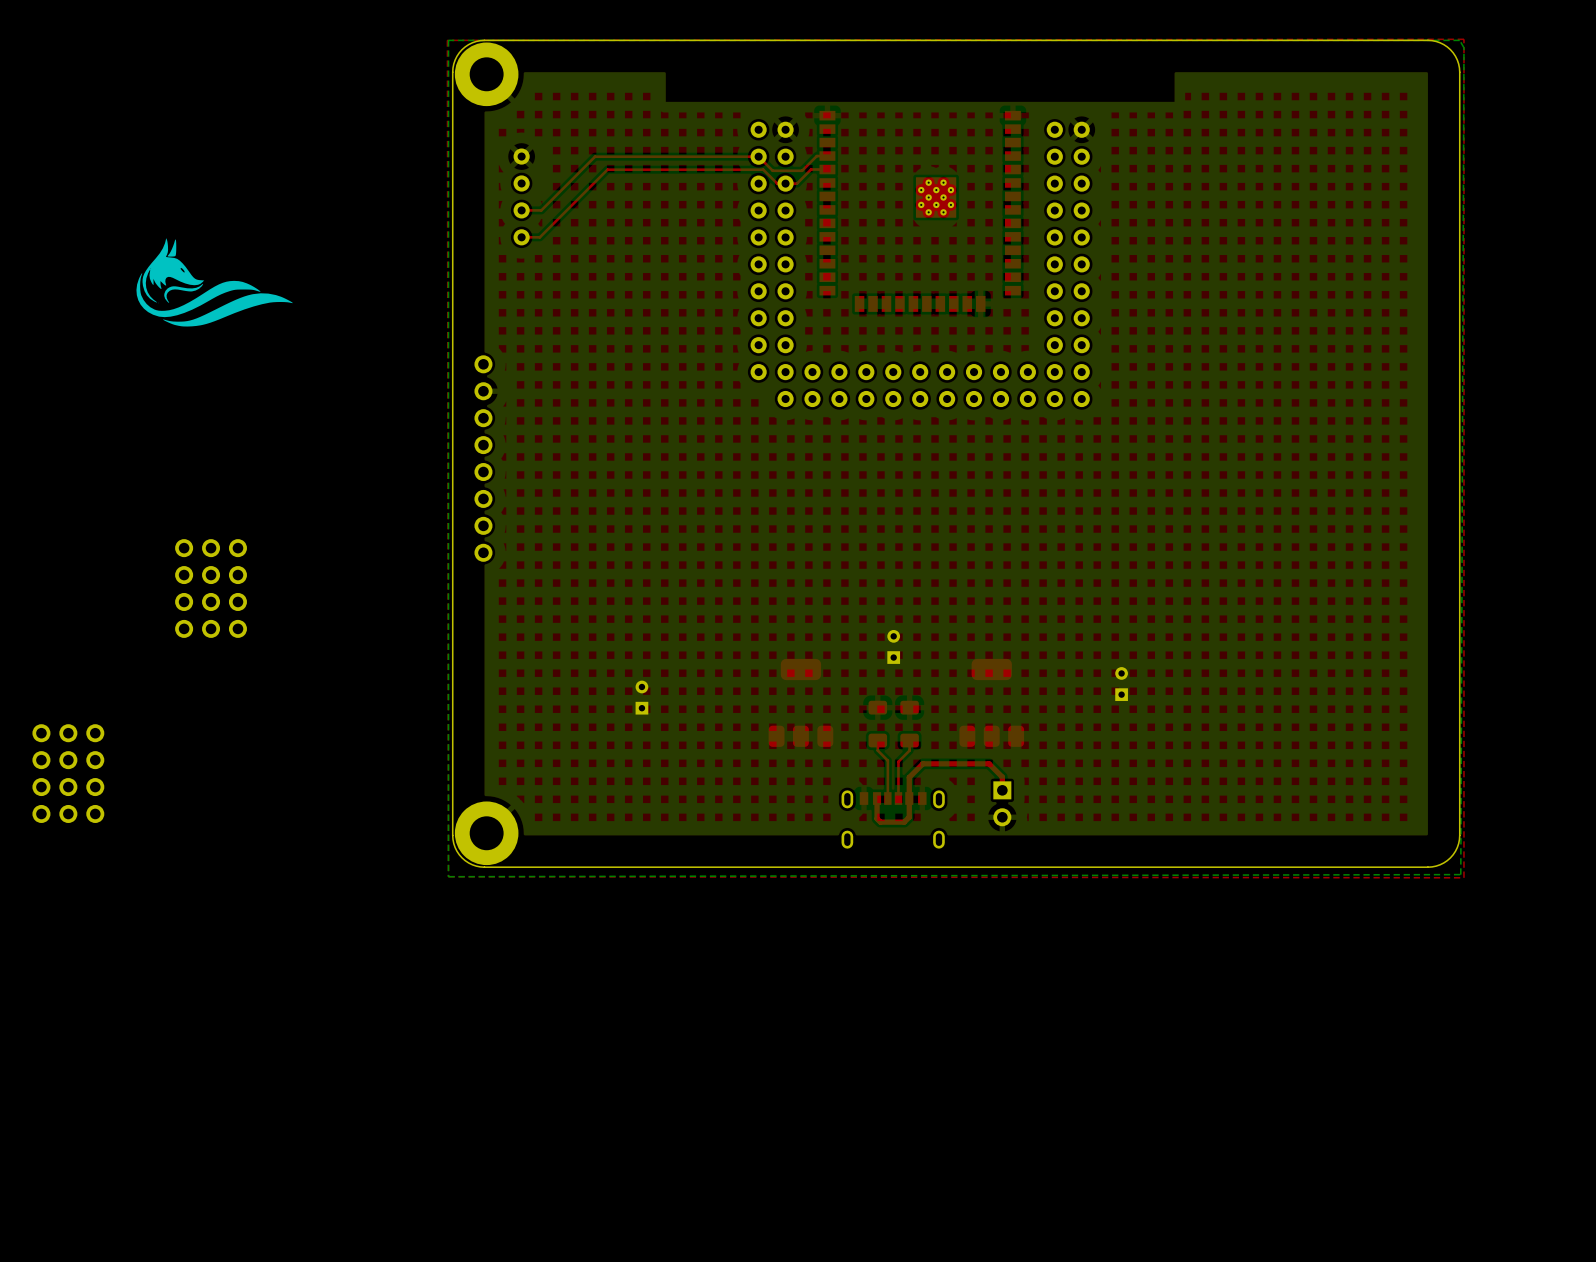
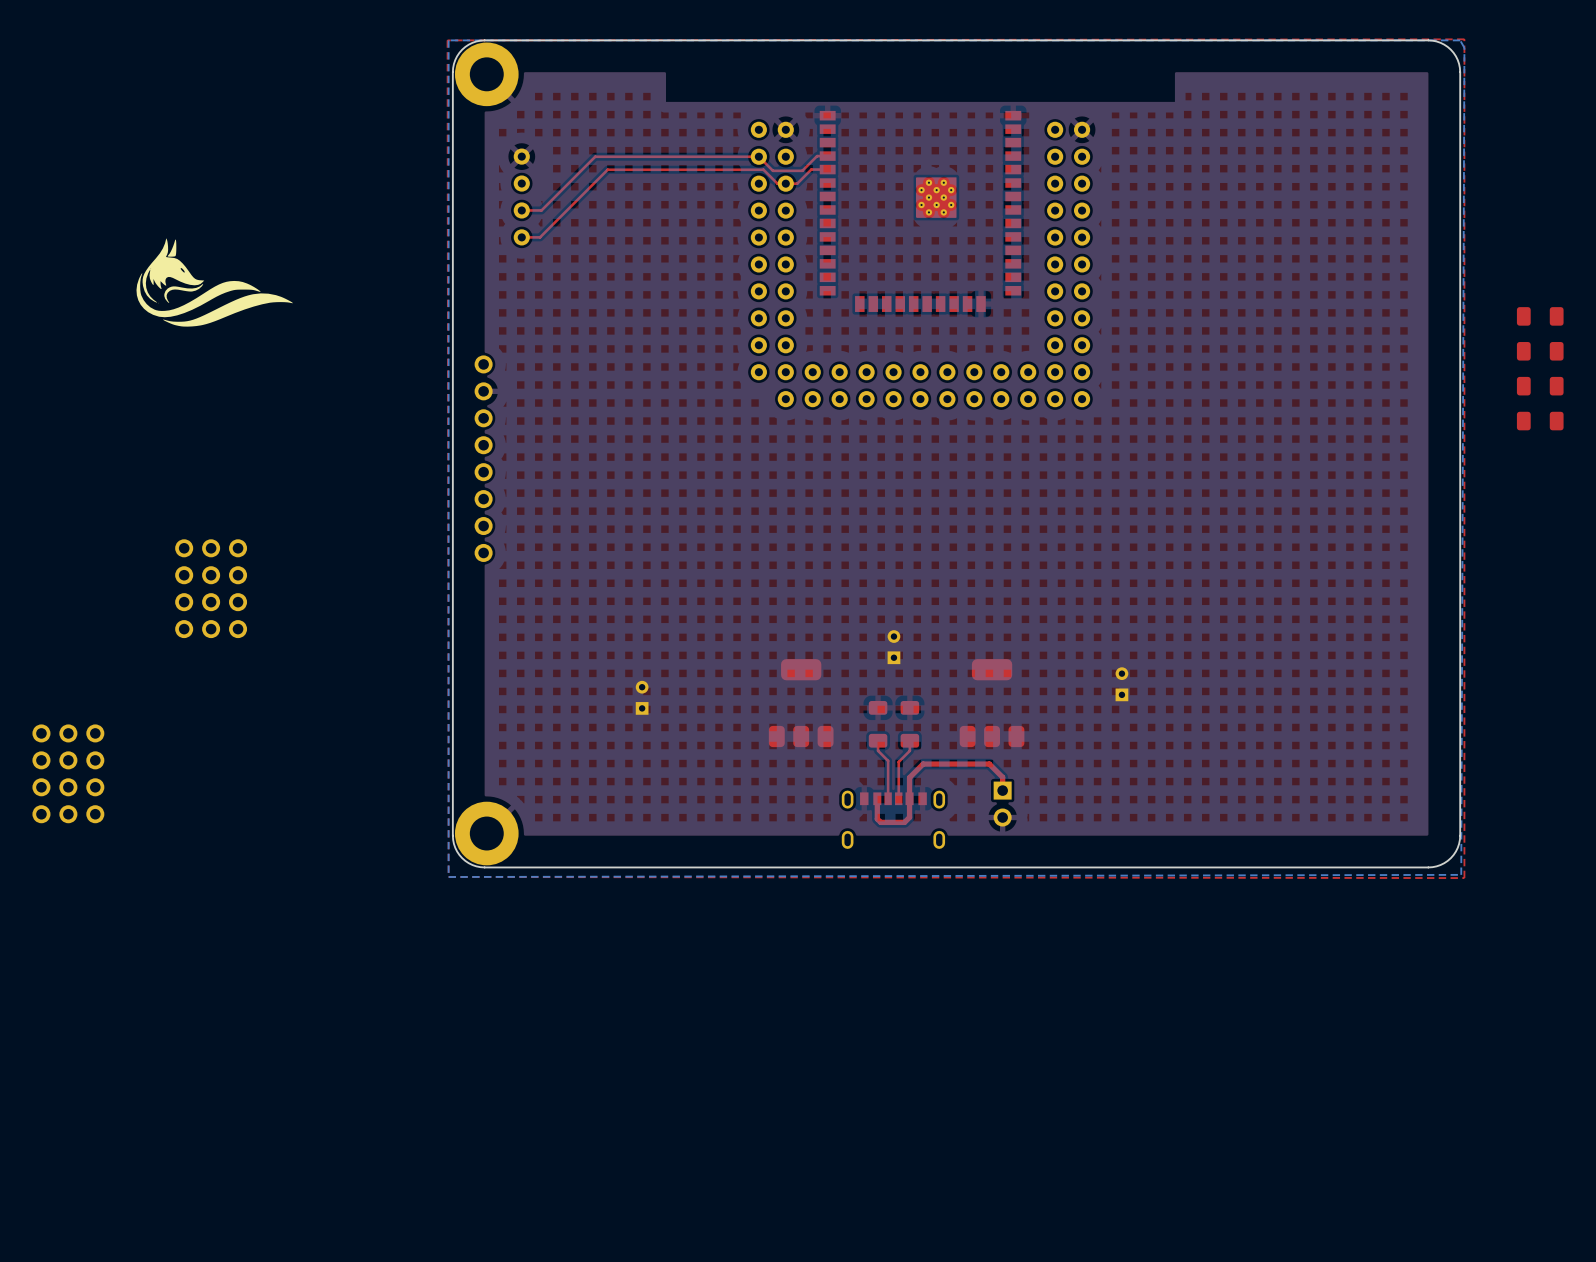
part: none -> (1540, 316)
part: none -> (1540, 351)
part: none -> (1540, 386)
part: none -> (1540, 421)

